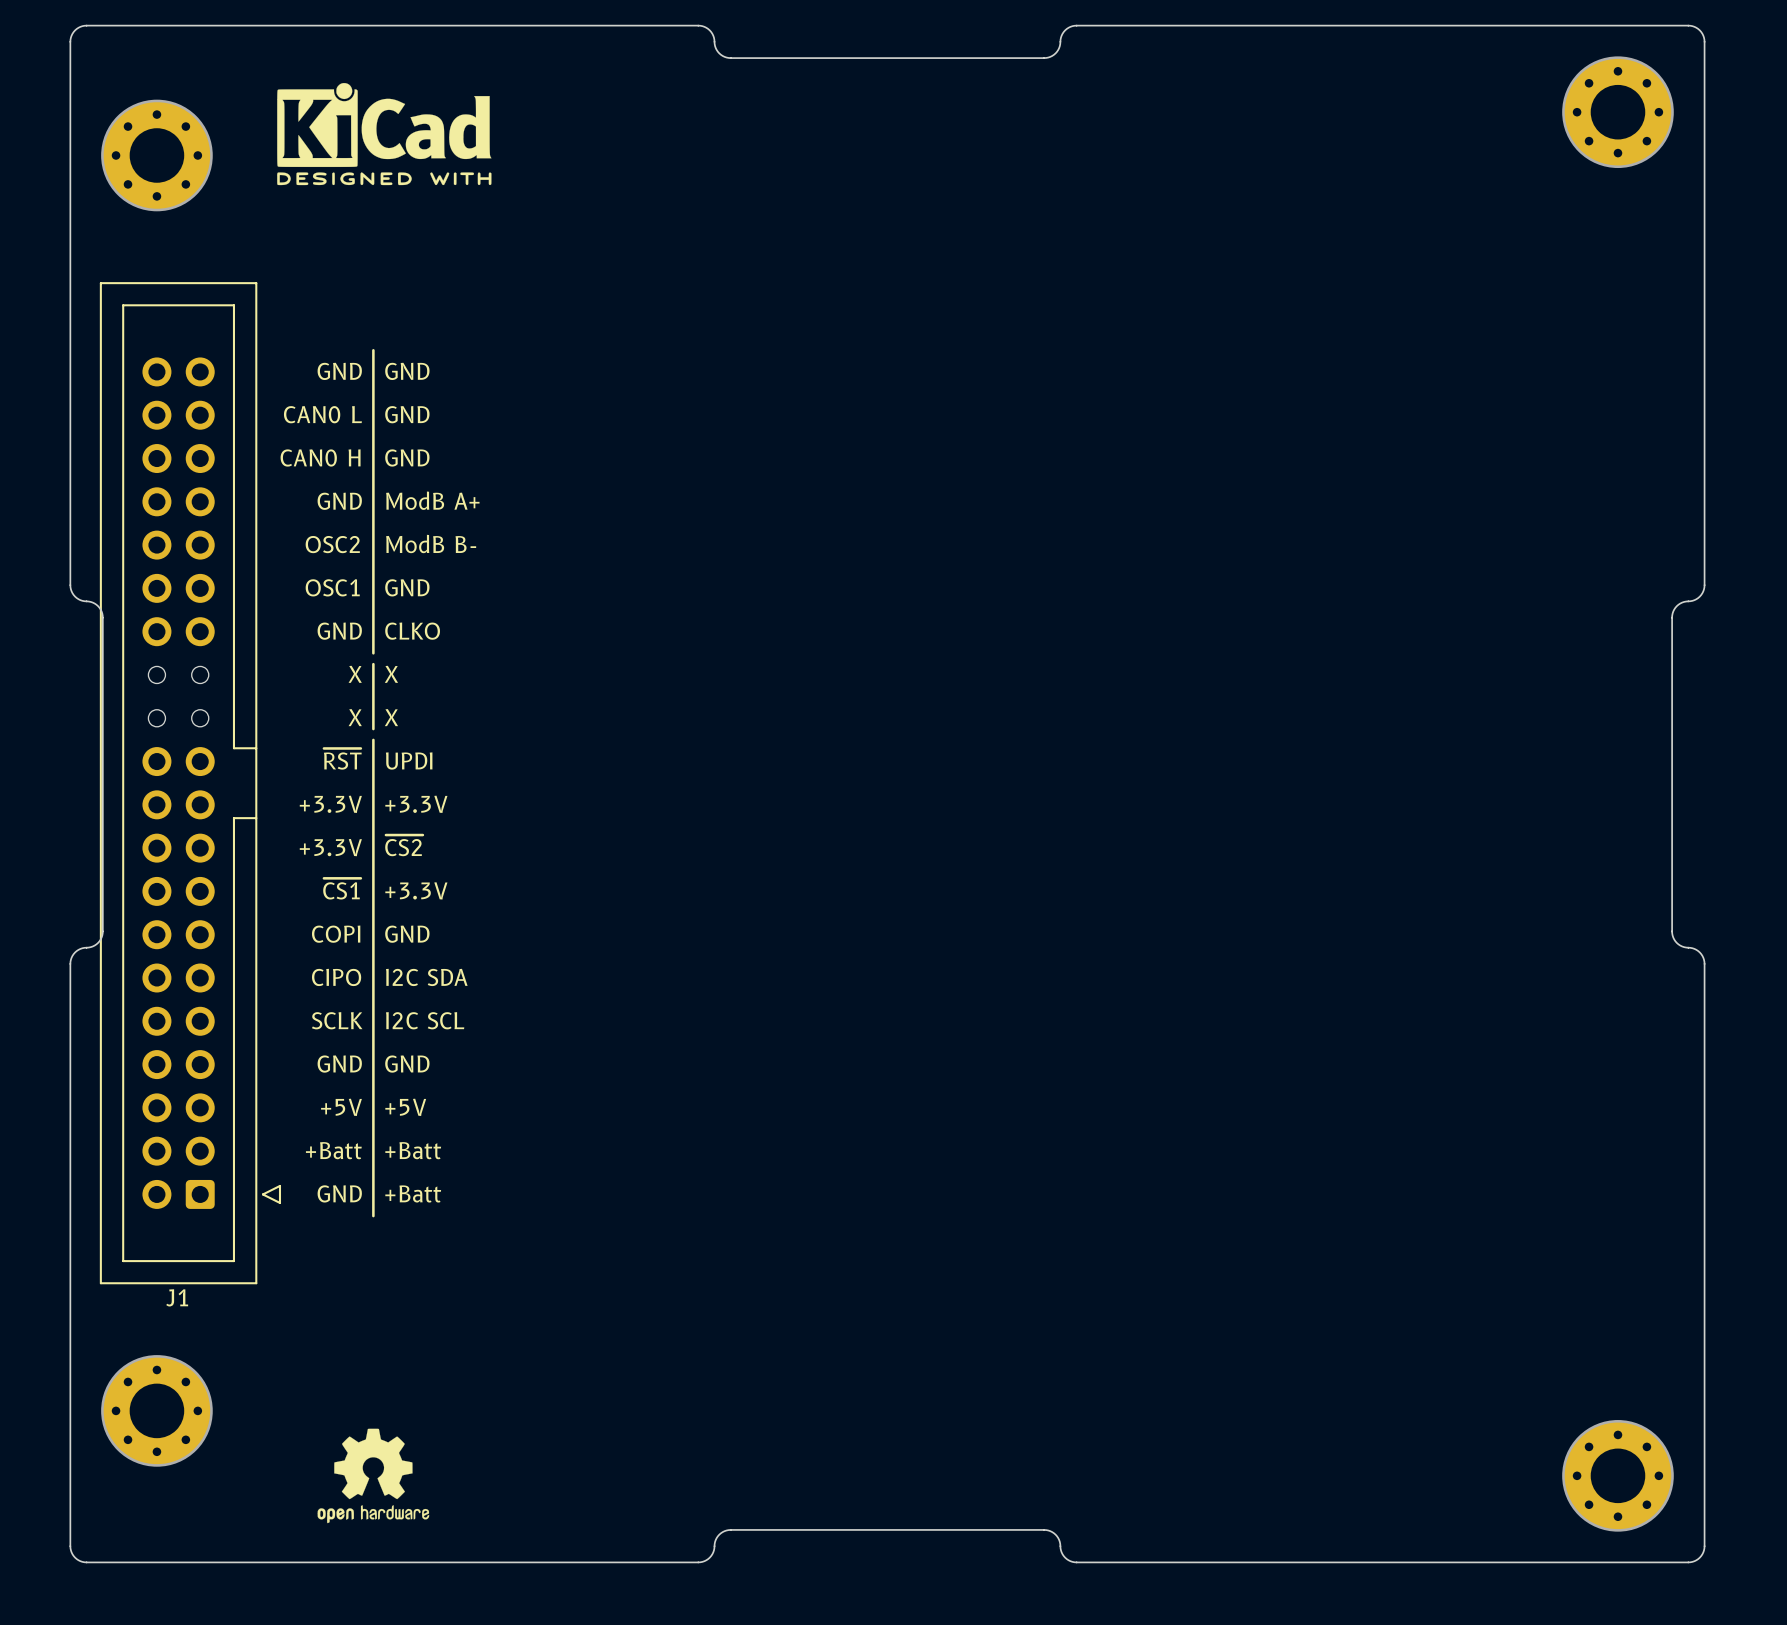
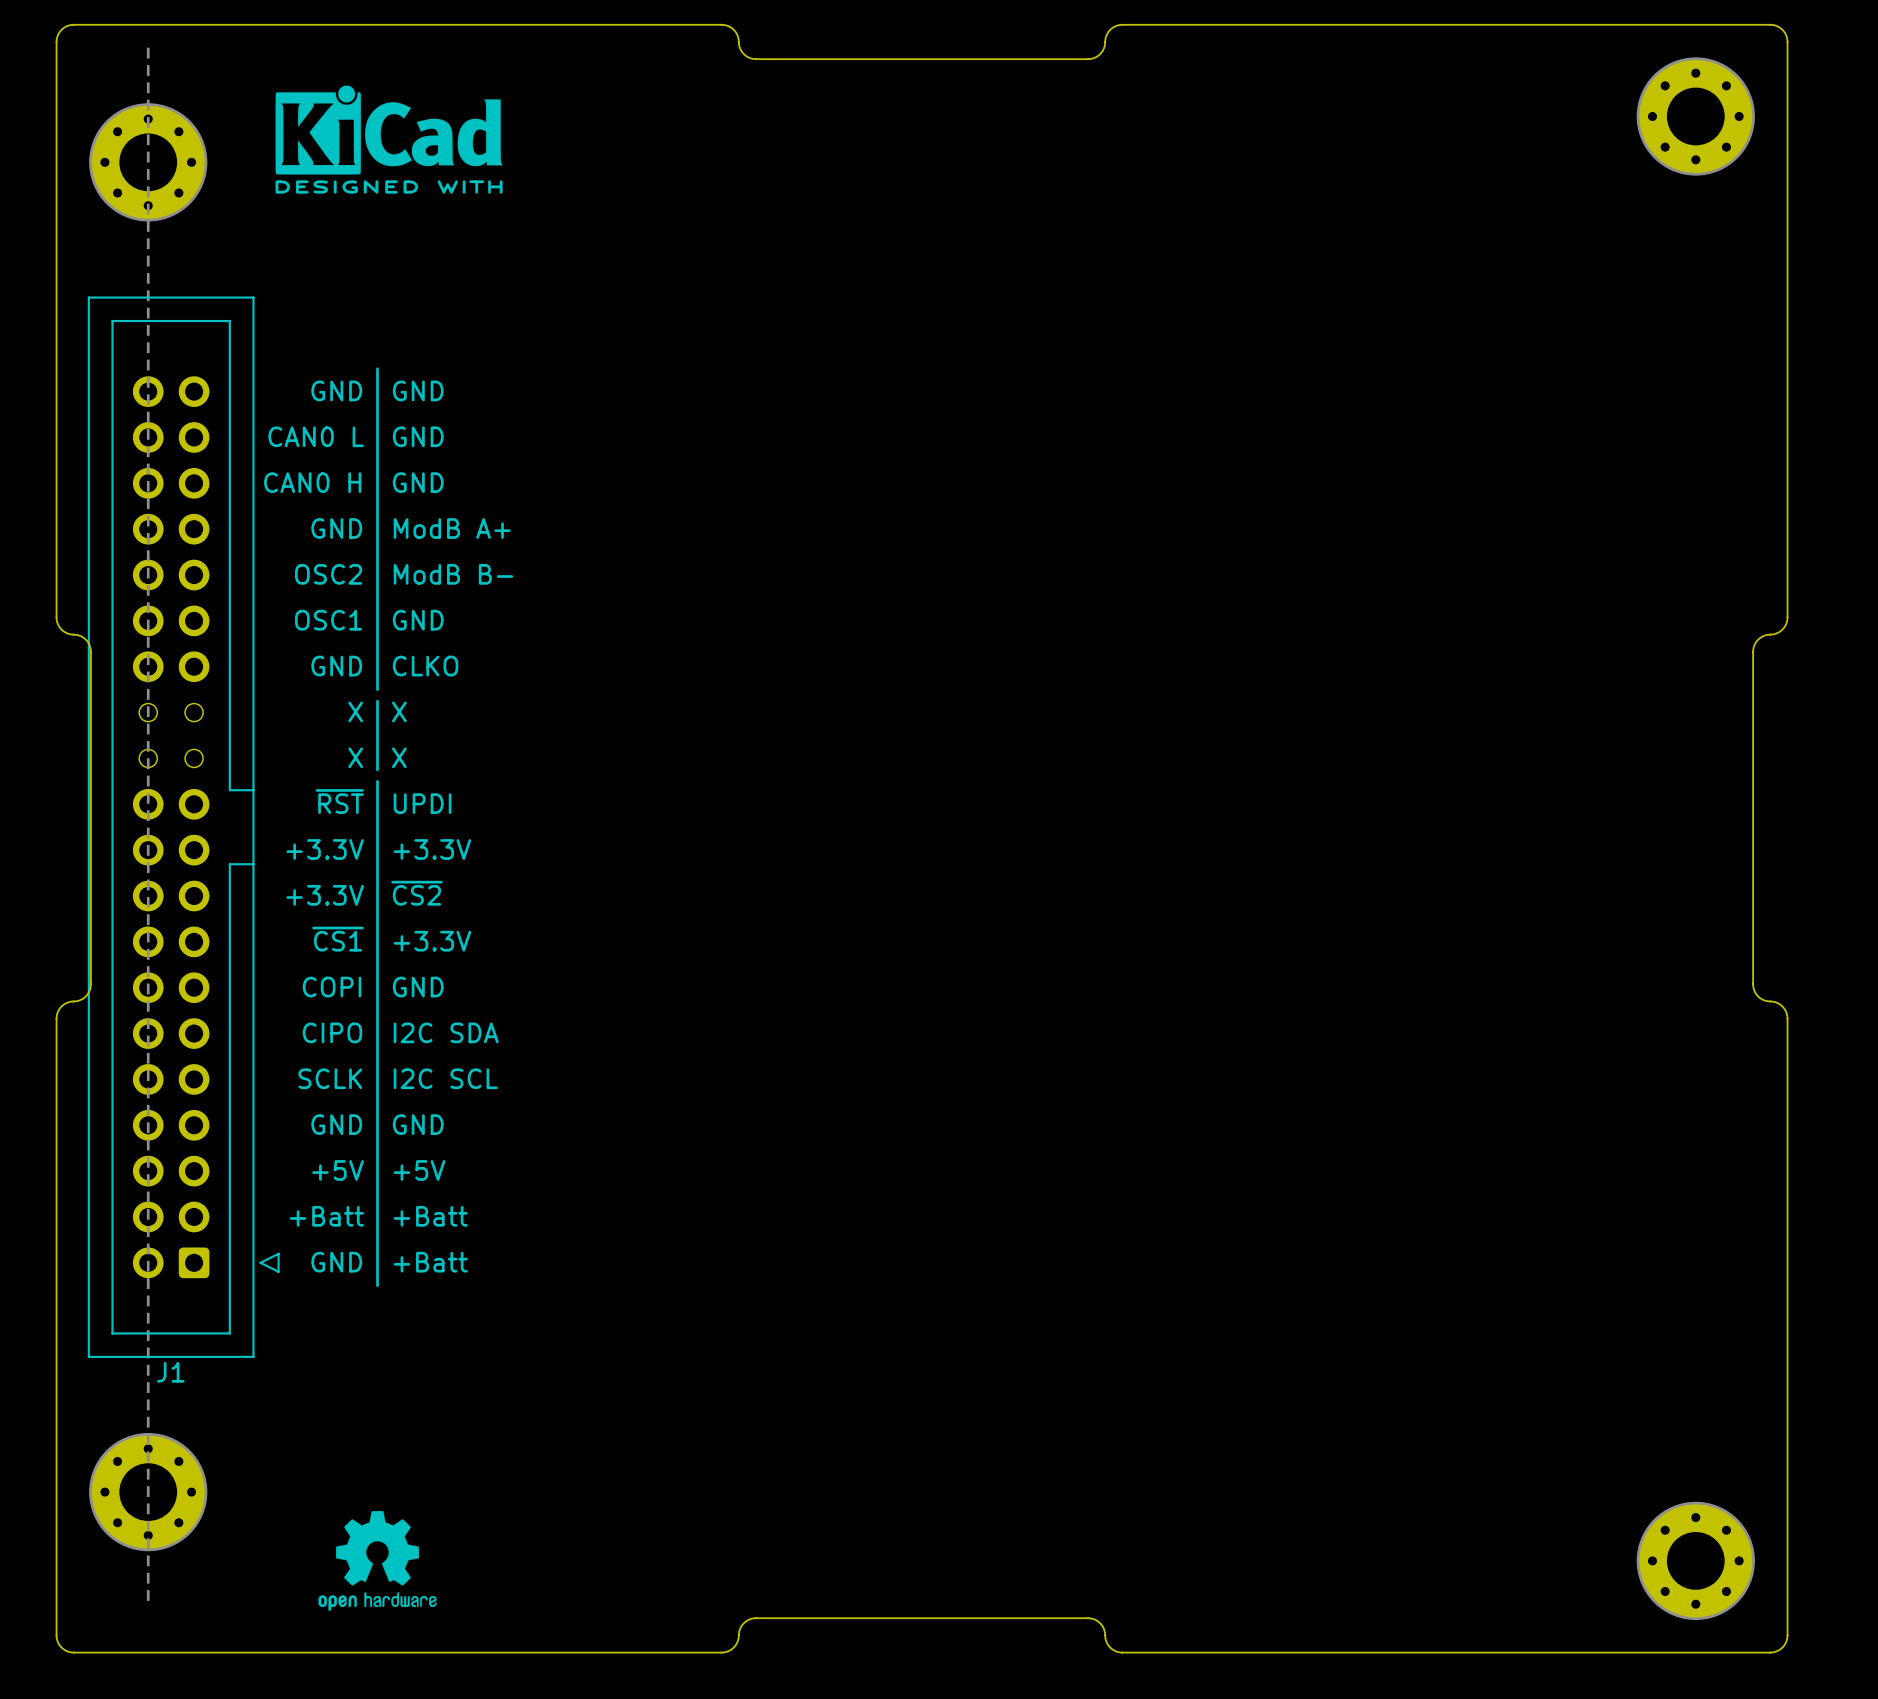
line: none -> (148, 47) (148, 1606)

